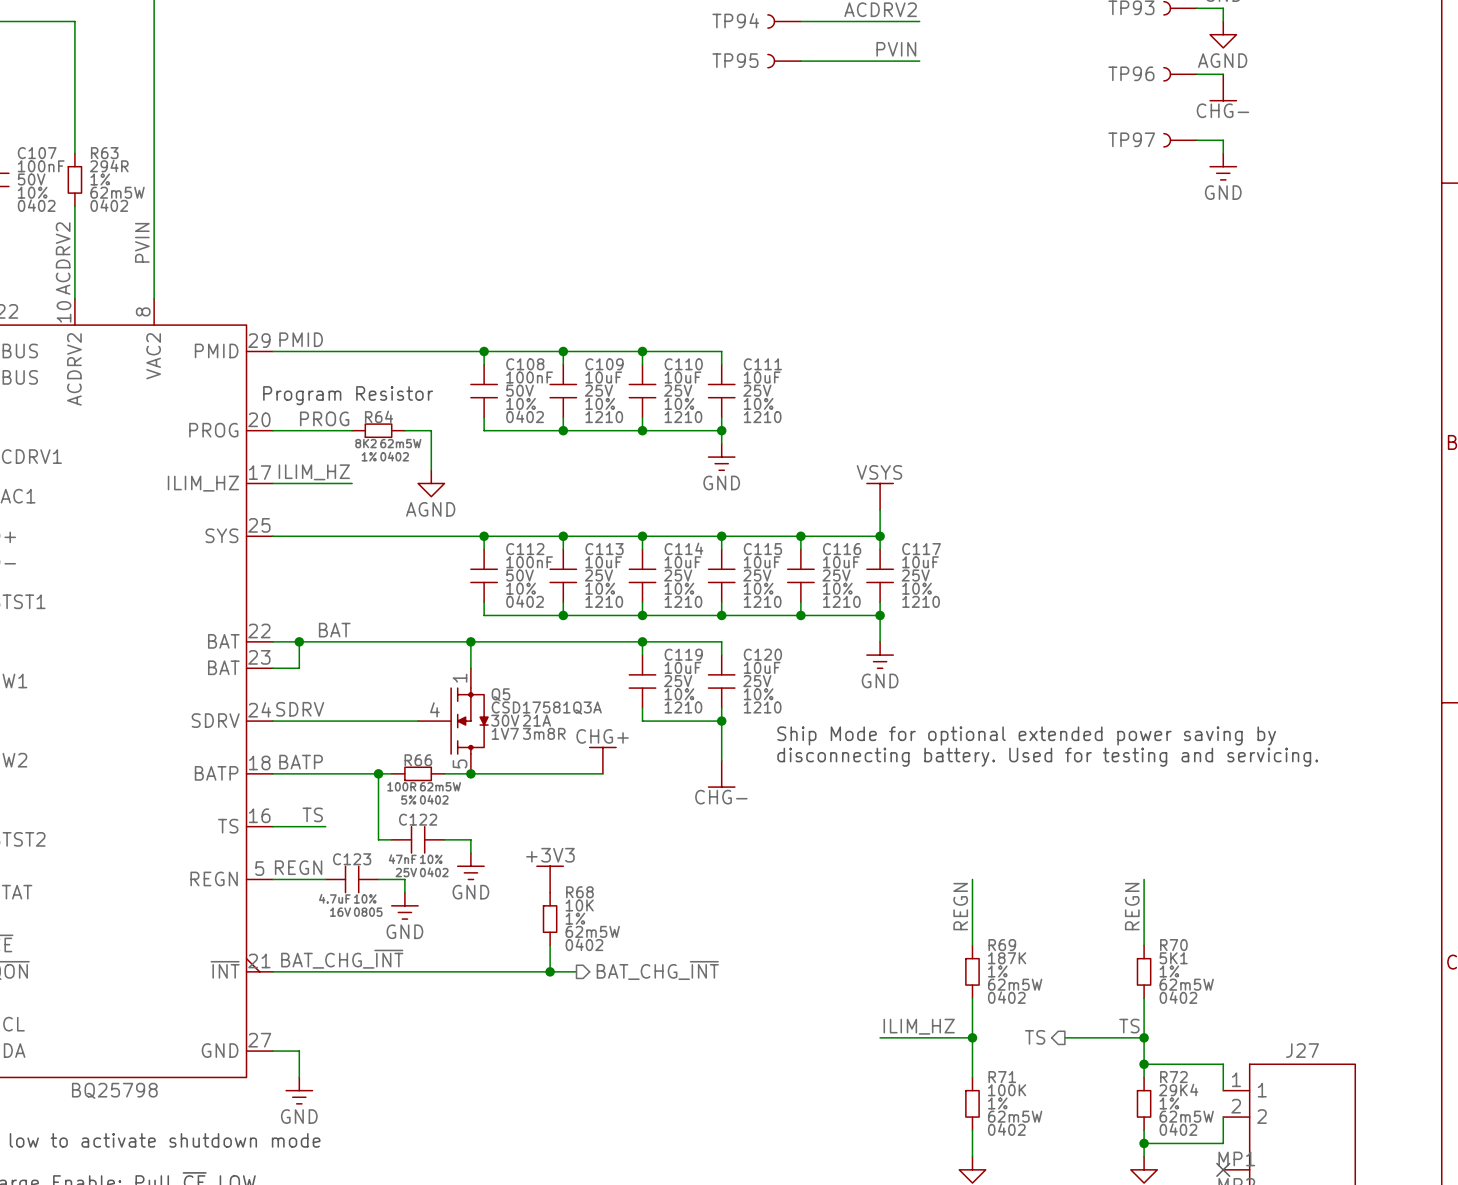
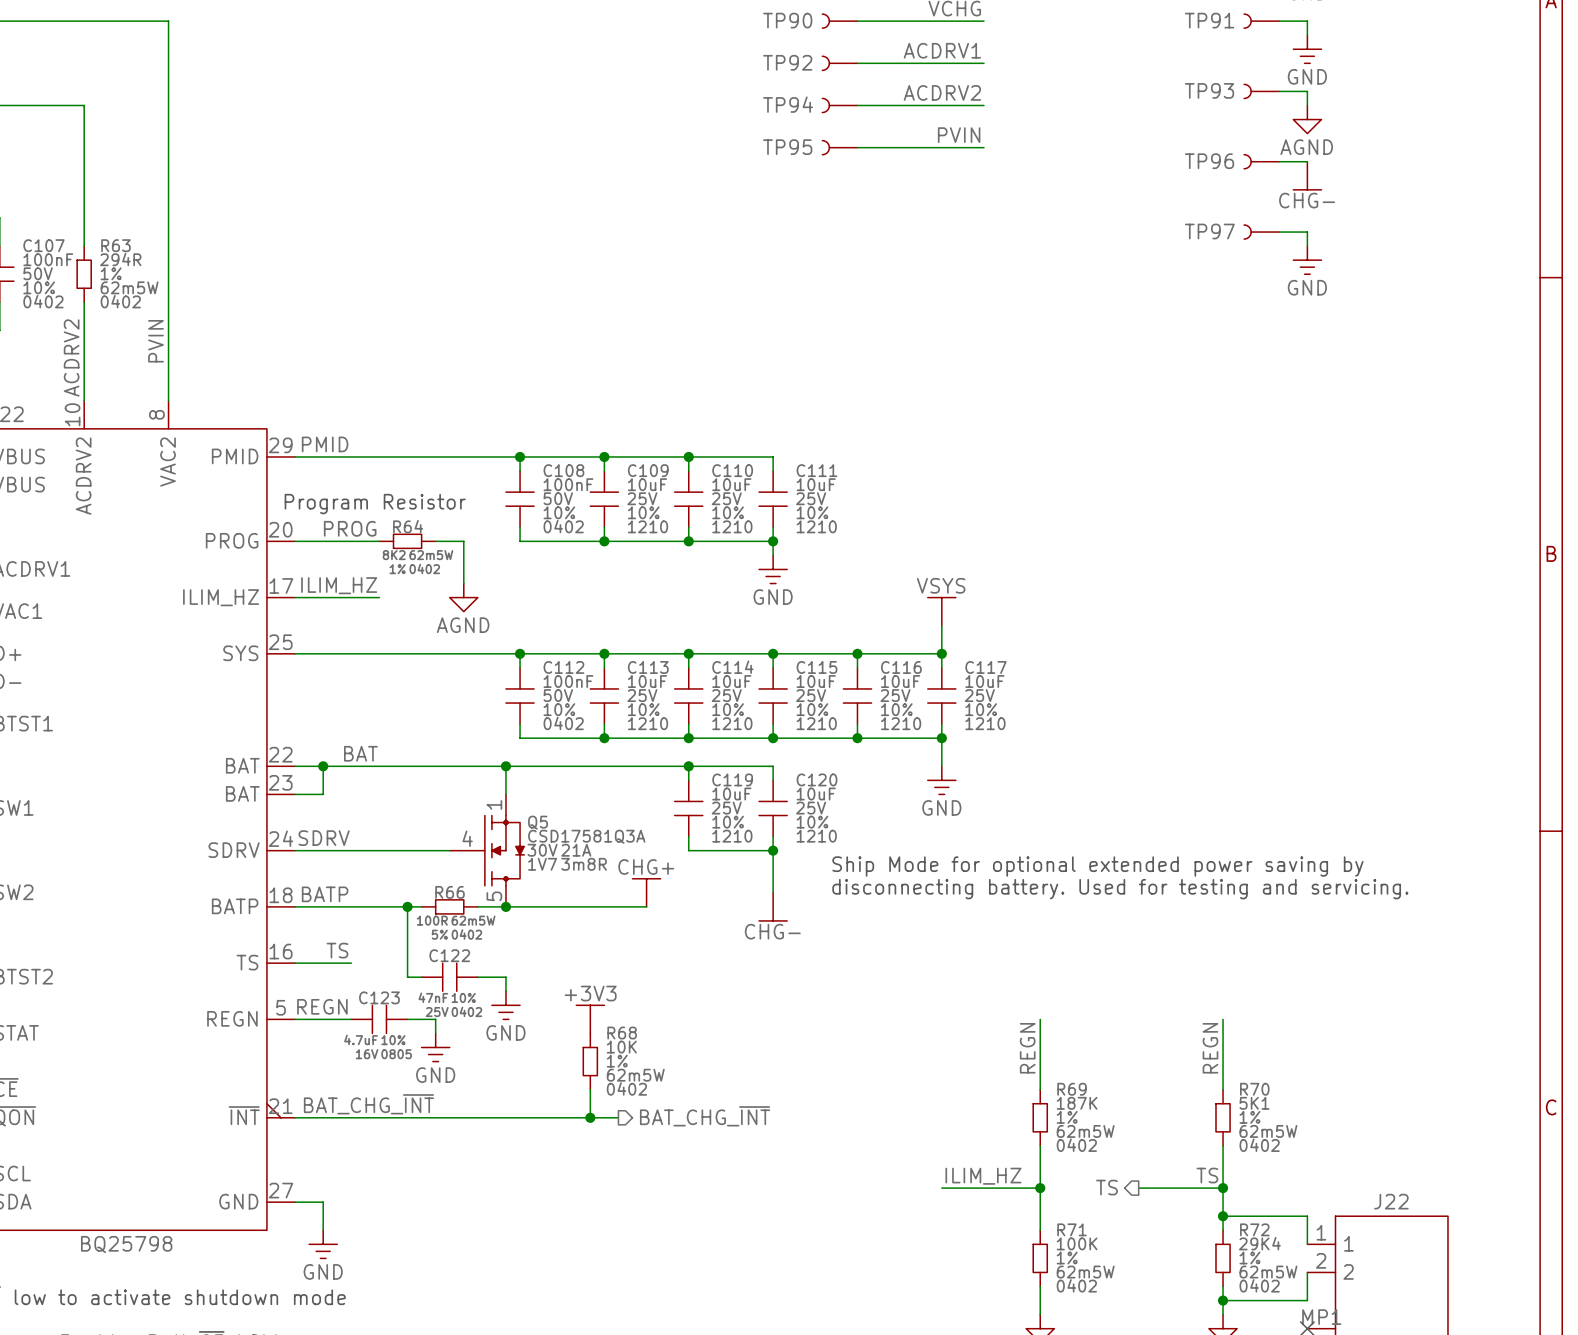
J27 name: J27 (1302, 1050) -> J22 (1391, 1201)

